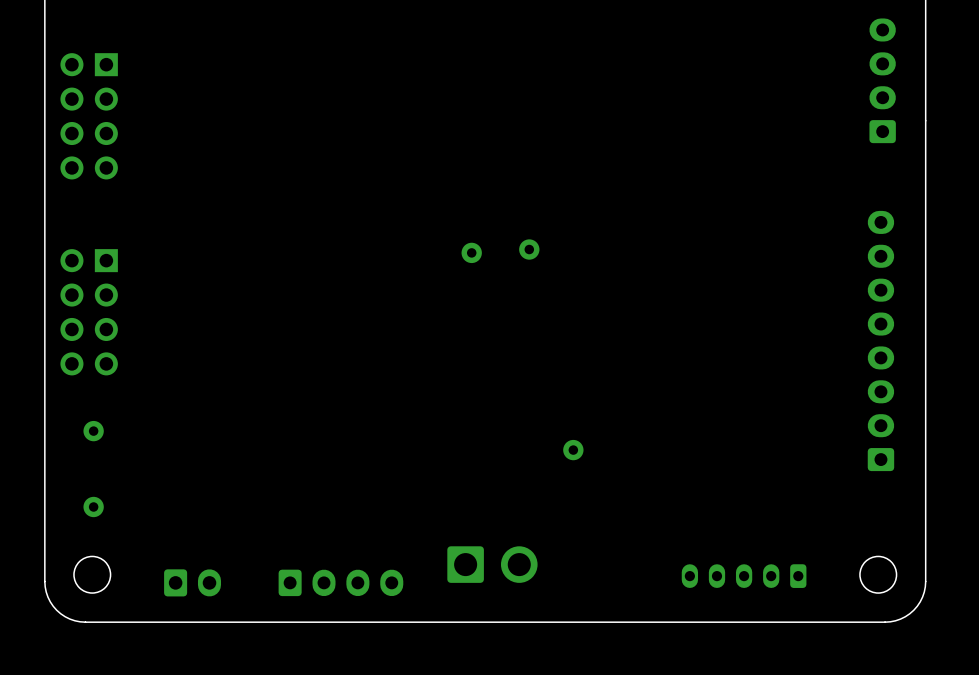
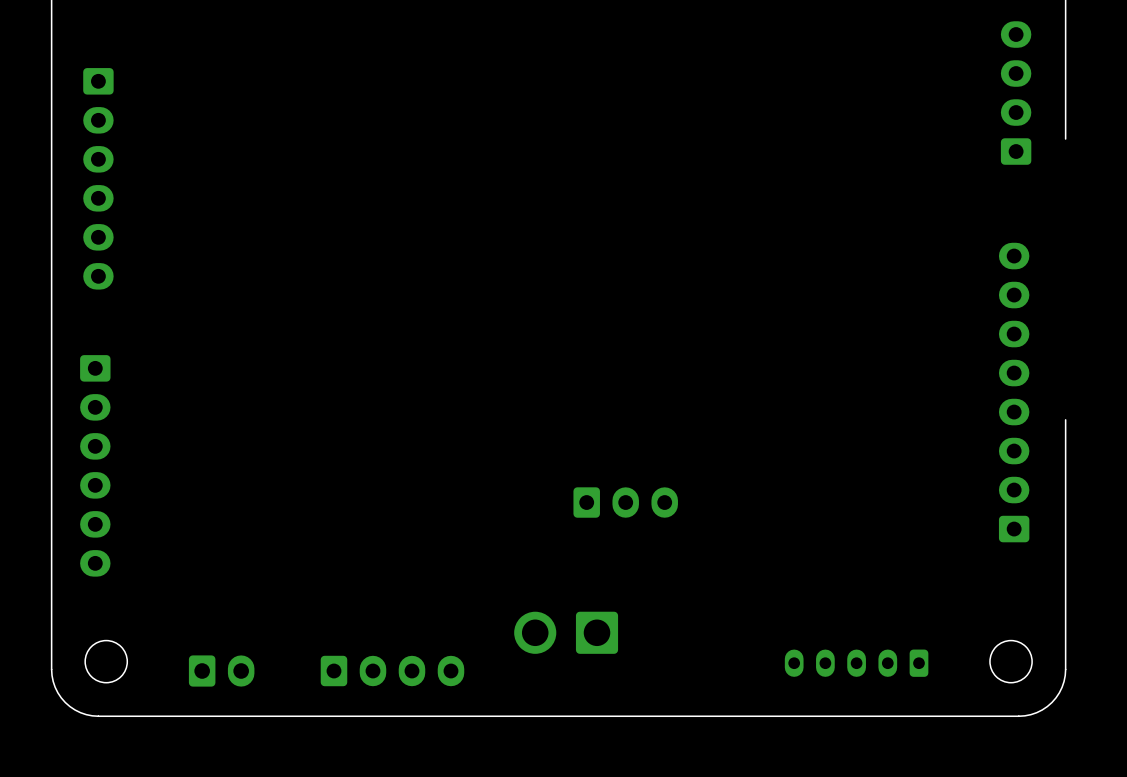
part: (89, 116) -> none
board edge: (925, 120) (925, 364) -> none
part: none -> (98, 178)
part: (529, 249) -> none
part: (471, 252) -> none
part: (89, 312) -> none
part: none -> (95, 465)
part: (93, 431) -> none
part: none -> (625, 502)
part: (573, 450) -> none
part: (93, 506) -> none
part rotation: 0° (492, 564) -> 180° (566, 632)

